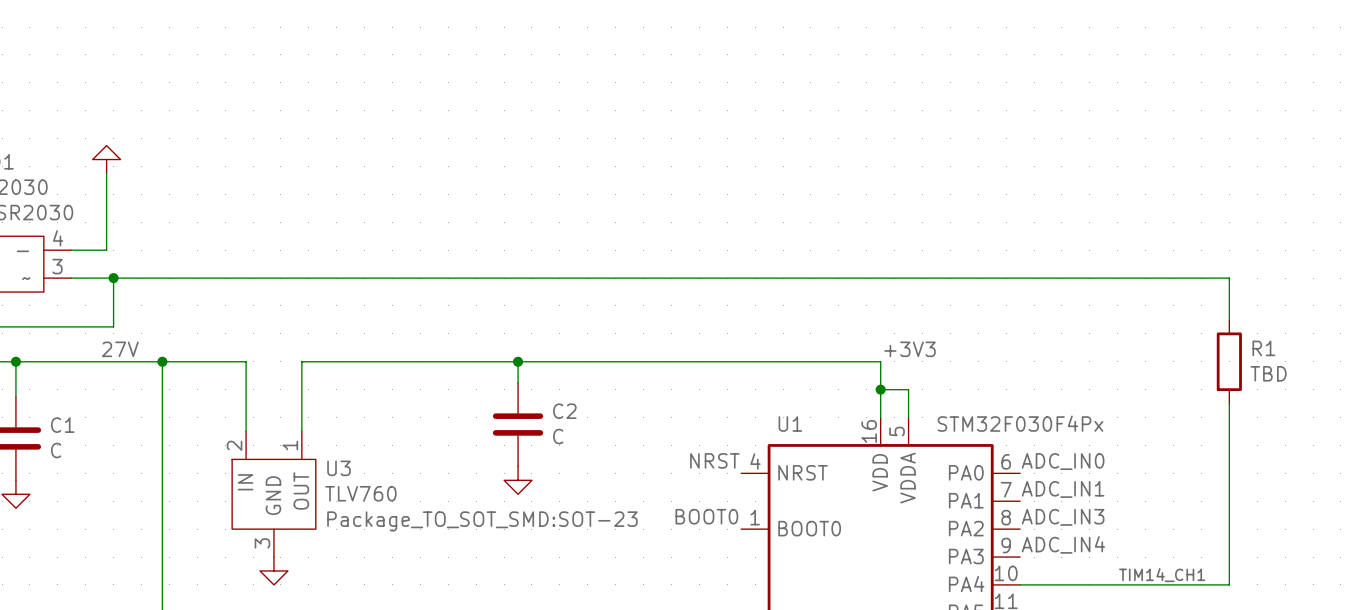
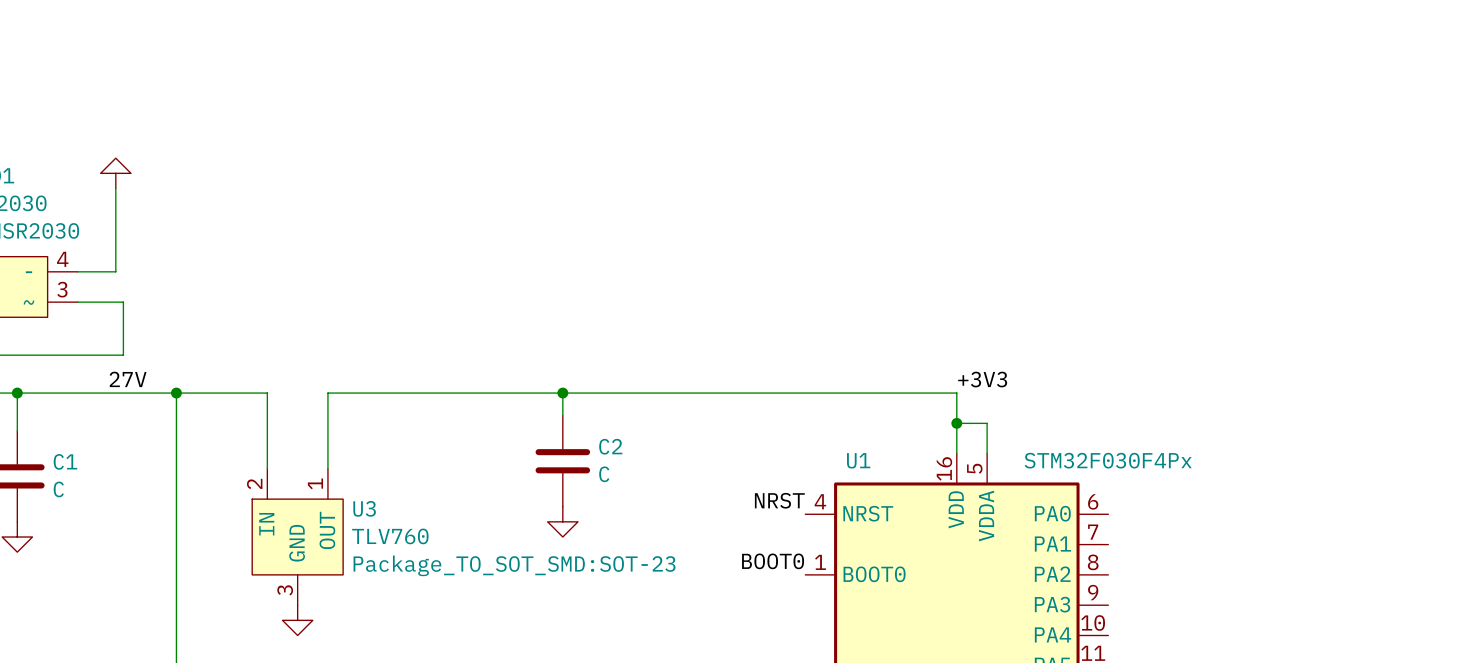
wire: (113, 278) (1229, 278) (1229, 319) -> none
junction: (113, 278) -> none
R1: TBD (1229, 361) -> none
wire: (1229, 403) (1229, 584) (1020, 584) -> none
label: ADC_IN0 (1063, 461) -> none
label: ADC_IN1 (1063, 489) -> none
label: ADC_IN3 (1063, 517) -> none
label: ADC_IN4 (1063, 544) -> none
label: TIM14_CH1 (1162, 575) -> none

